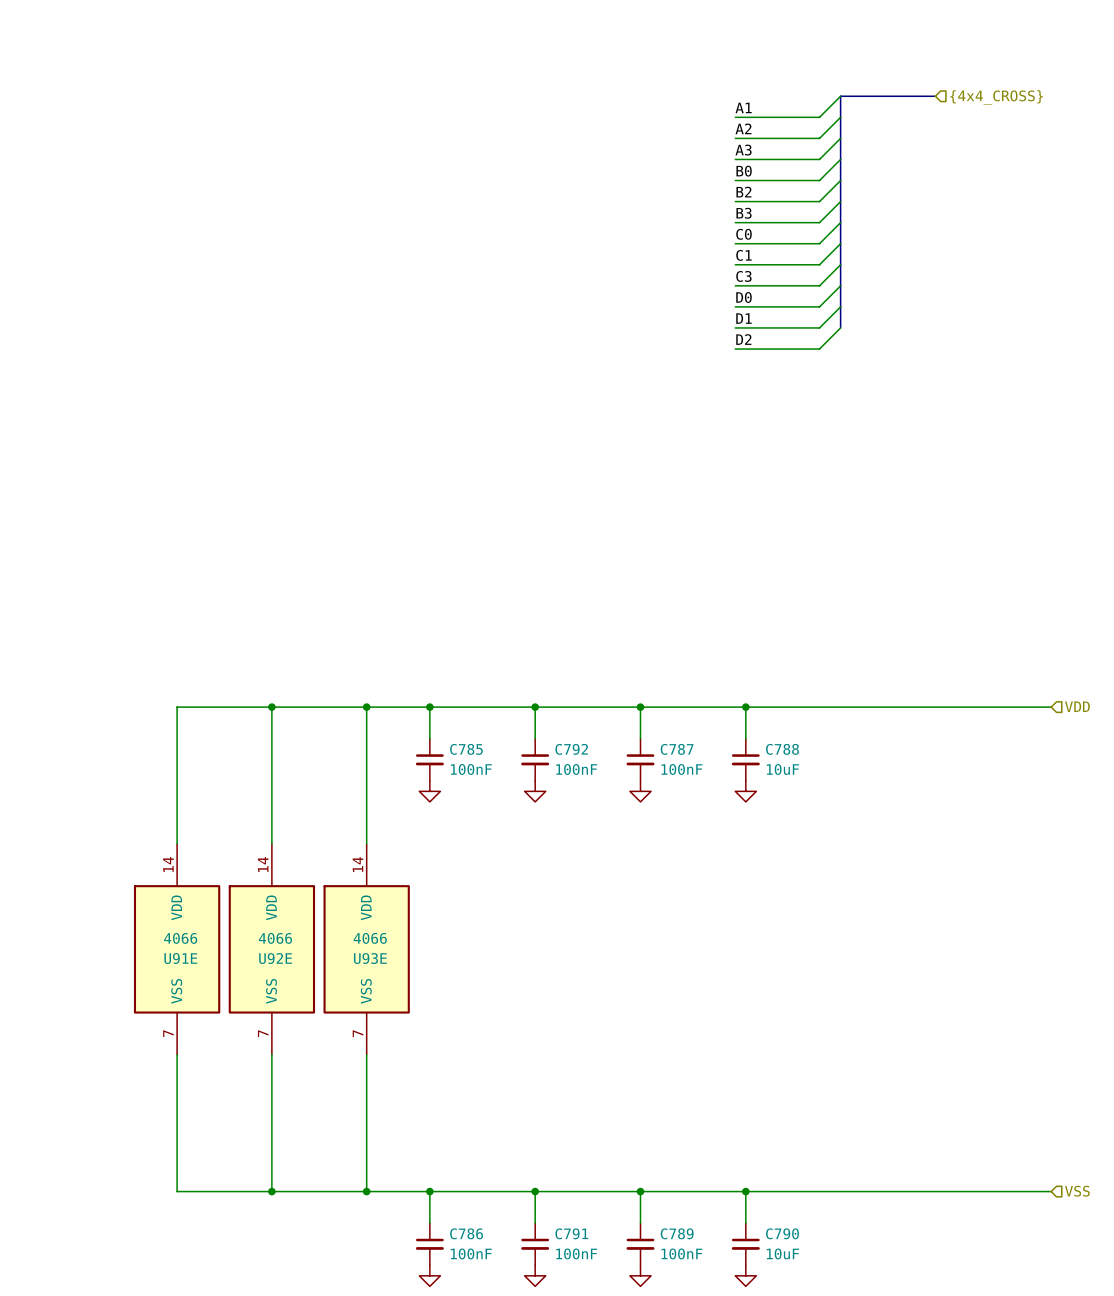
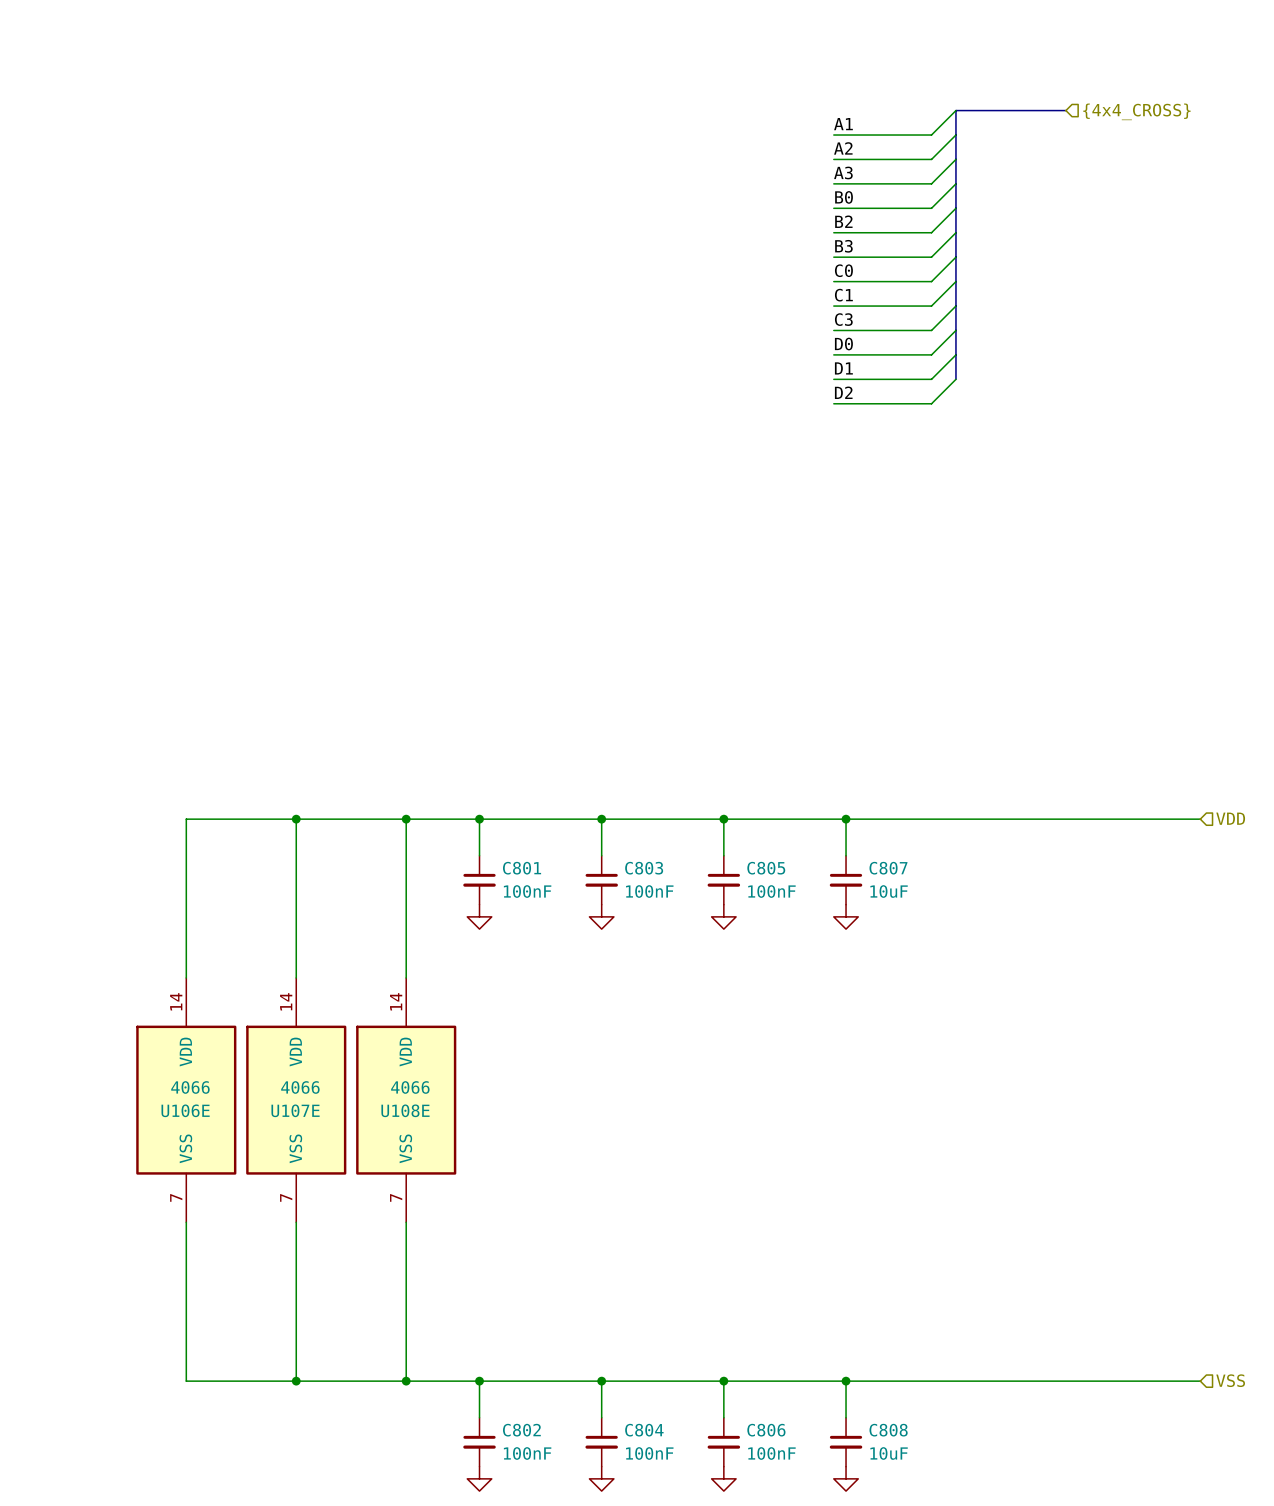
C785 name: C785 (466, 749) -> C801 (522, 868)
C792 name: C792 (571, 749) -> C803 (644, 868)
C787 name: C787 (677, 749) -> C805 (766, 868)
C788 name: C788 (782, 749) -> C807 (888, 868)
U91E name: U91E (180, 958) -> U106E (185, 1110)
U92E name: U92E (275, 958) -> U107E (295, 1110)
U93E name: U93E (370, 958) -> U108E (405, 1110)
C786 name: C786 (466, 1233) -> C802 (521, 1430)
C791 name: C791 (571, 1233) -> C804 (644, 1430)
C789 name: C789 (677, 1233) -> C806 (766, 1430)
C790 name: C790 (782, 1233) -> C808 (888, 1430)

